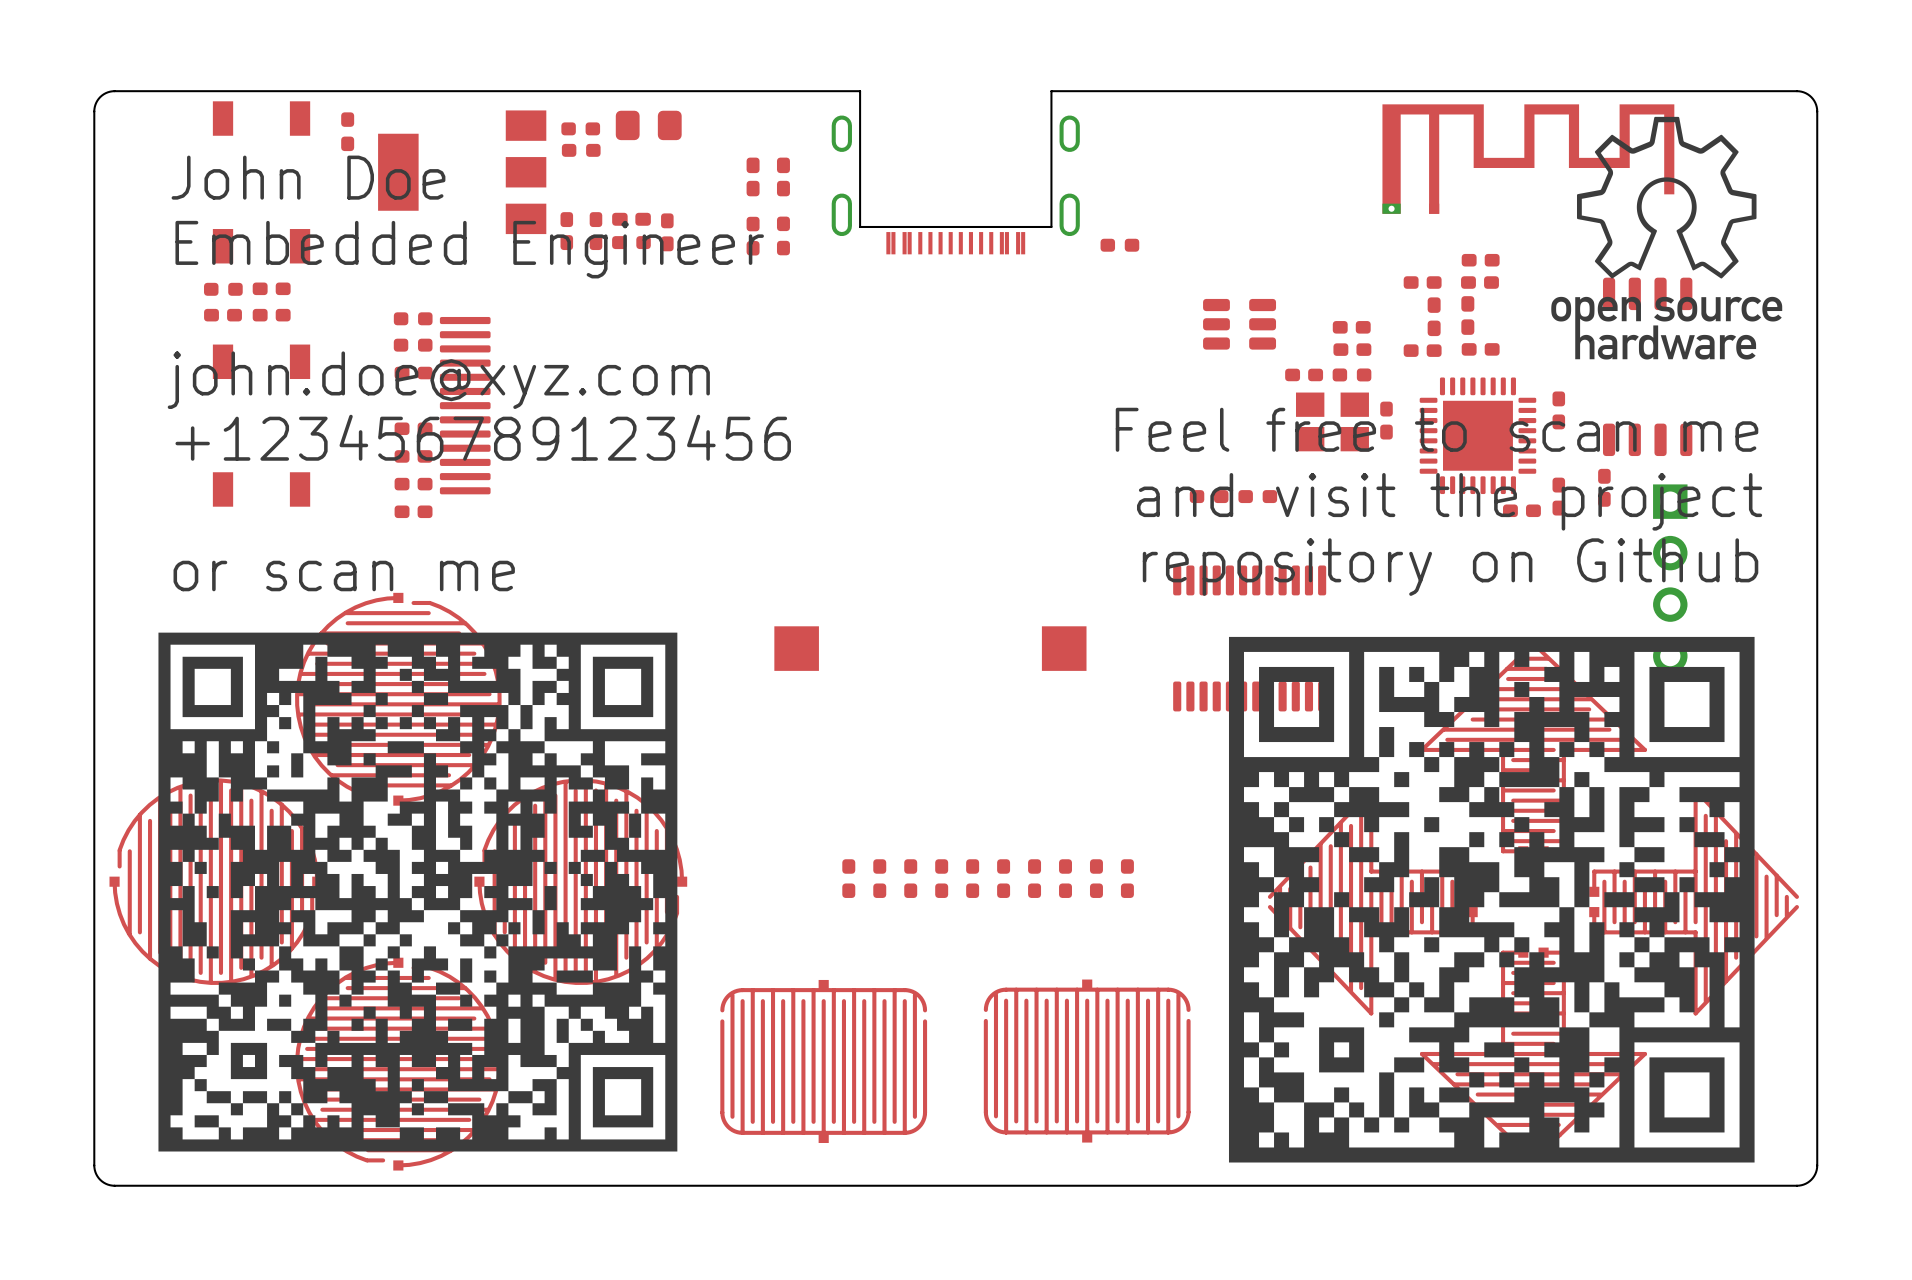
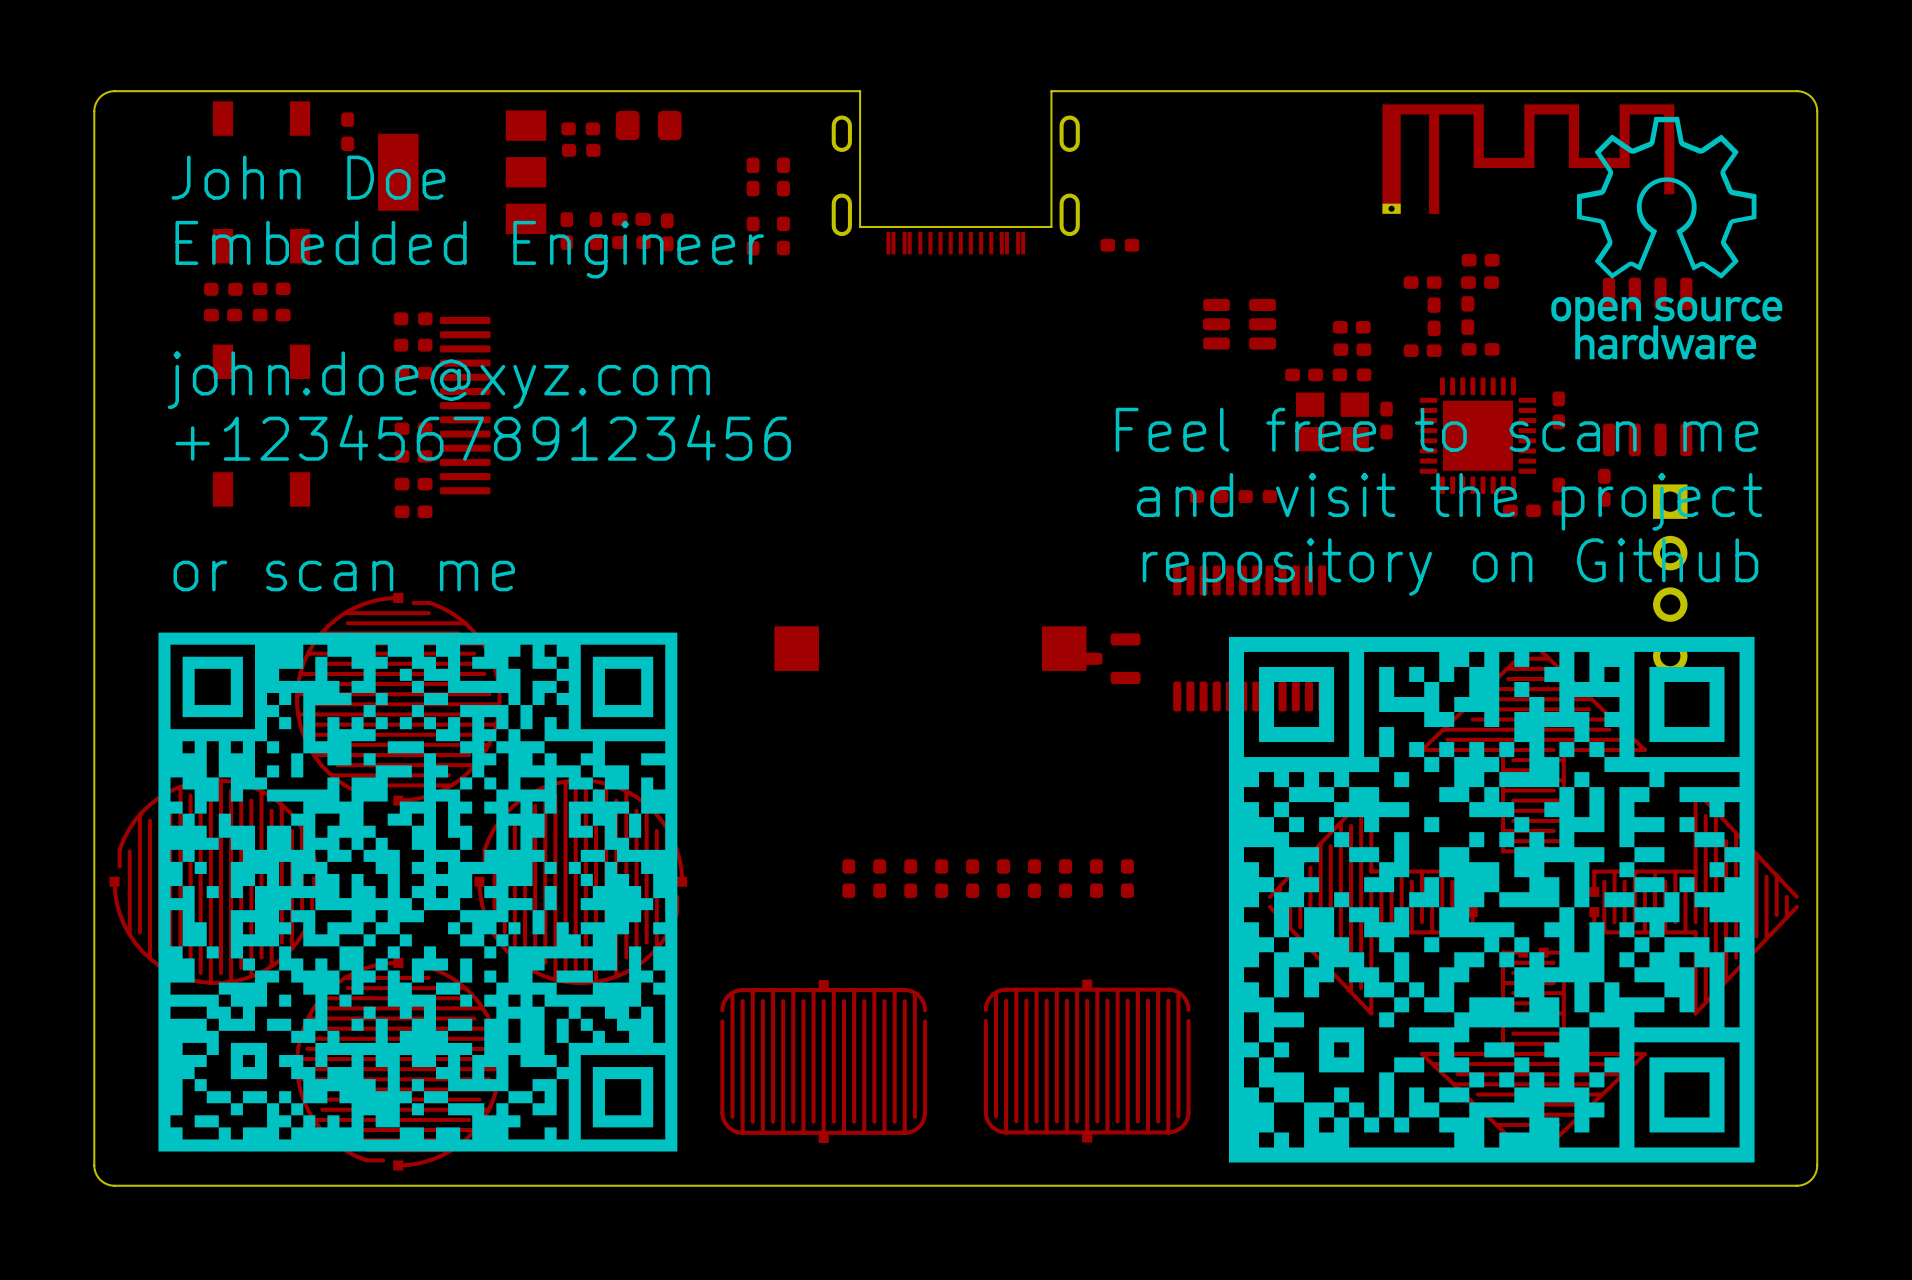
part: none -> (1106, 658)

